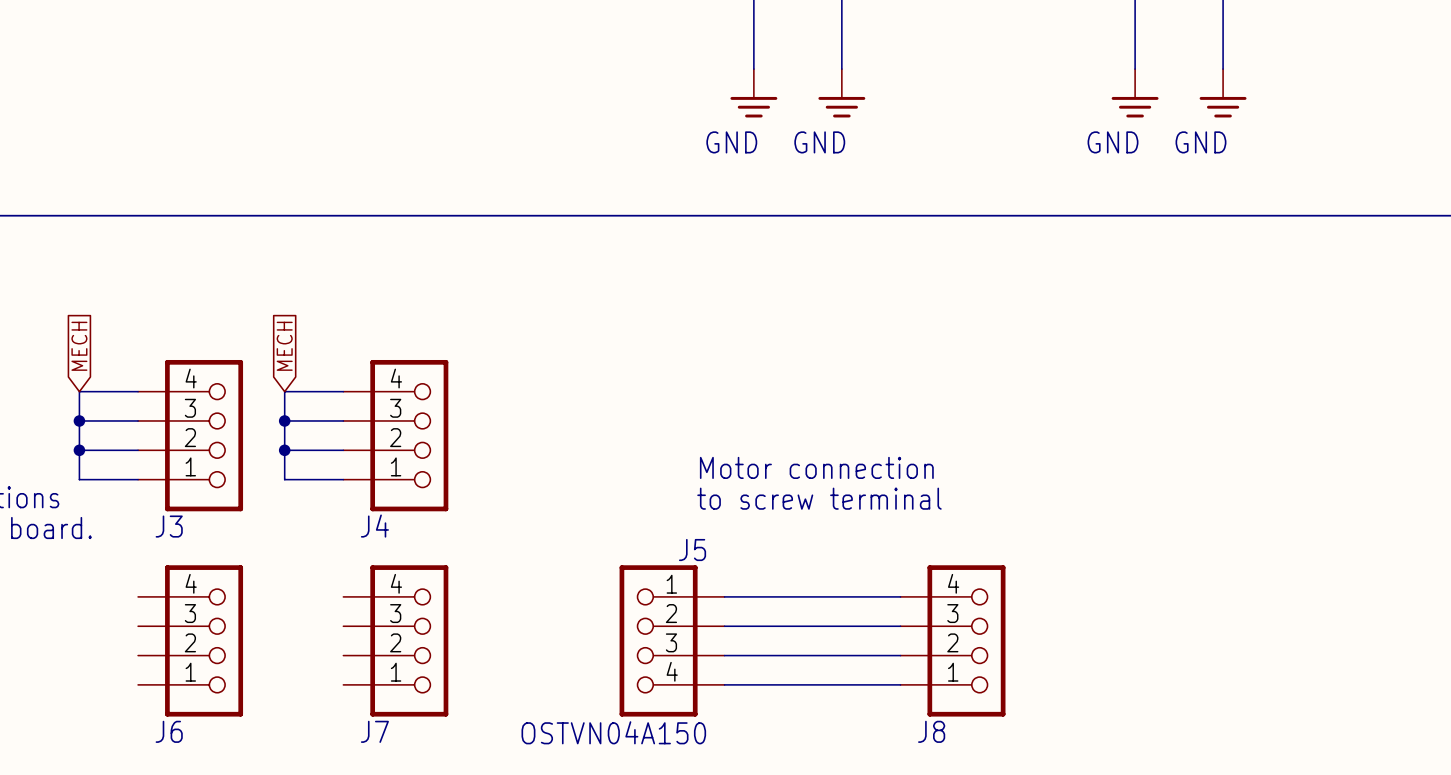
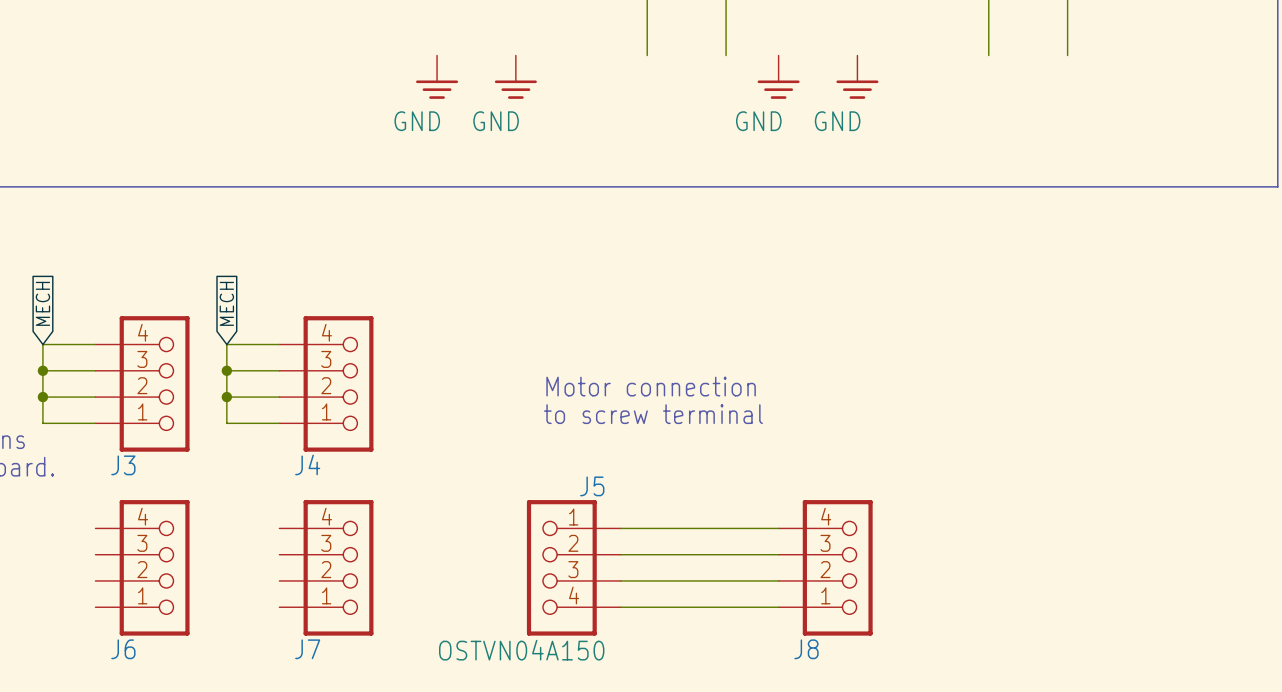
power symbol: none -> GND (437, 77)
power symbol: none -> GND (515, 77)
power symbol: GND (753, 93) -> none
power symbol position: GND (841, 93) -> GND (778, 77)
power symbol: none -> GND (857, 77)
power symbol: GND (1135, 93) -> none
power symbol: GND (1223, 93) -> none
text position: Motor connection (816, 467) -> Motor connection (651, 386)
text position: to screw terminal (819, 498) -> to screw terminal (653, 414)

